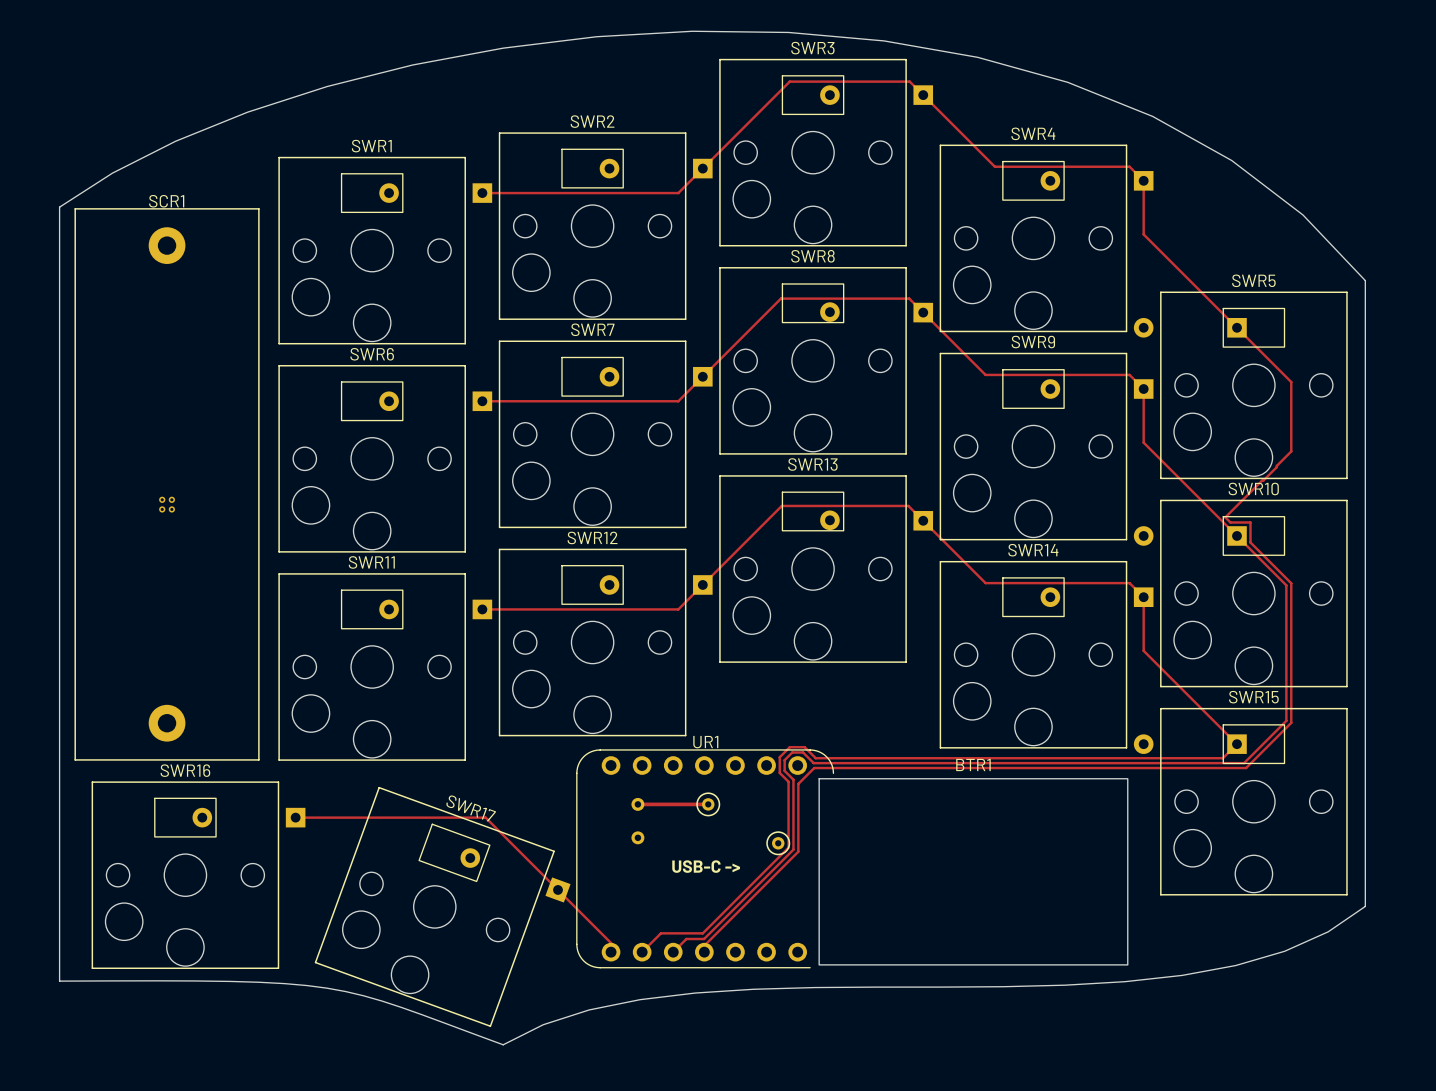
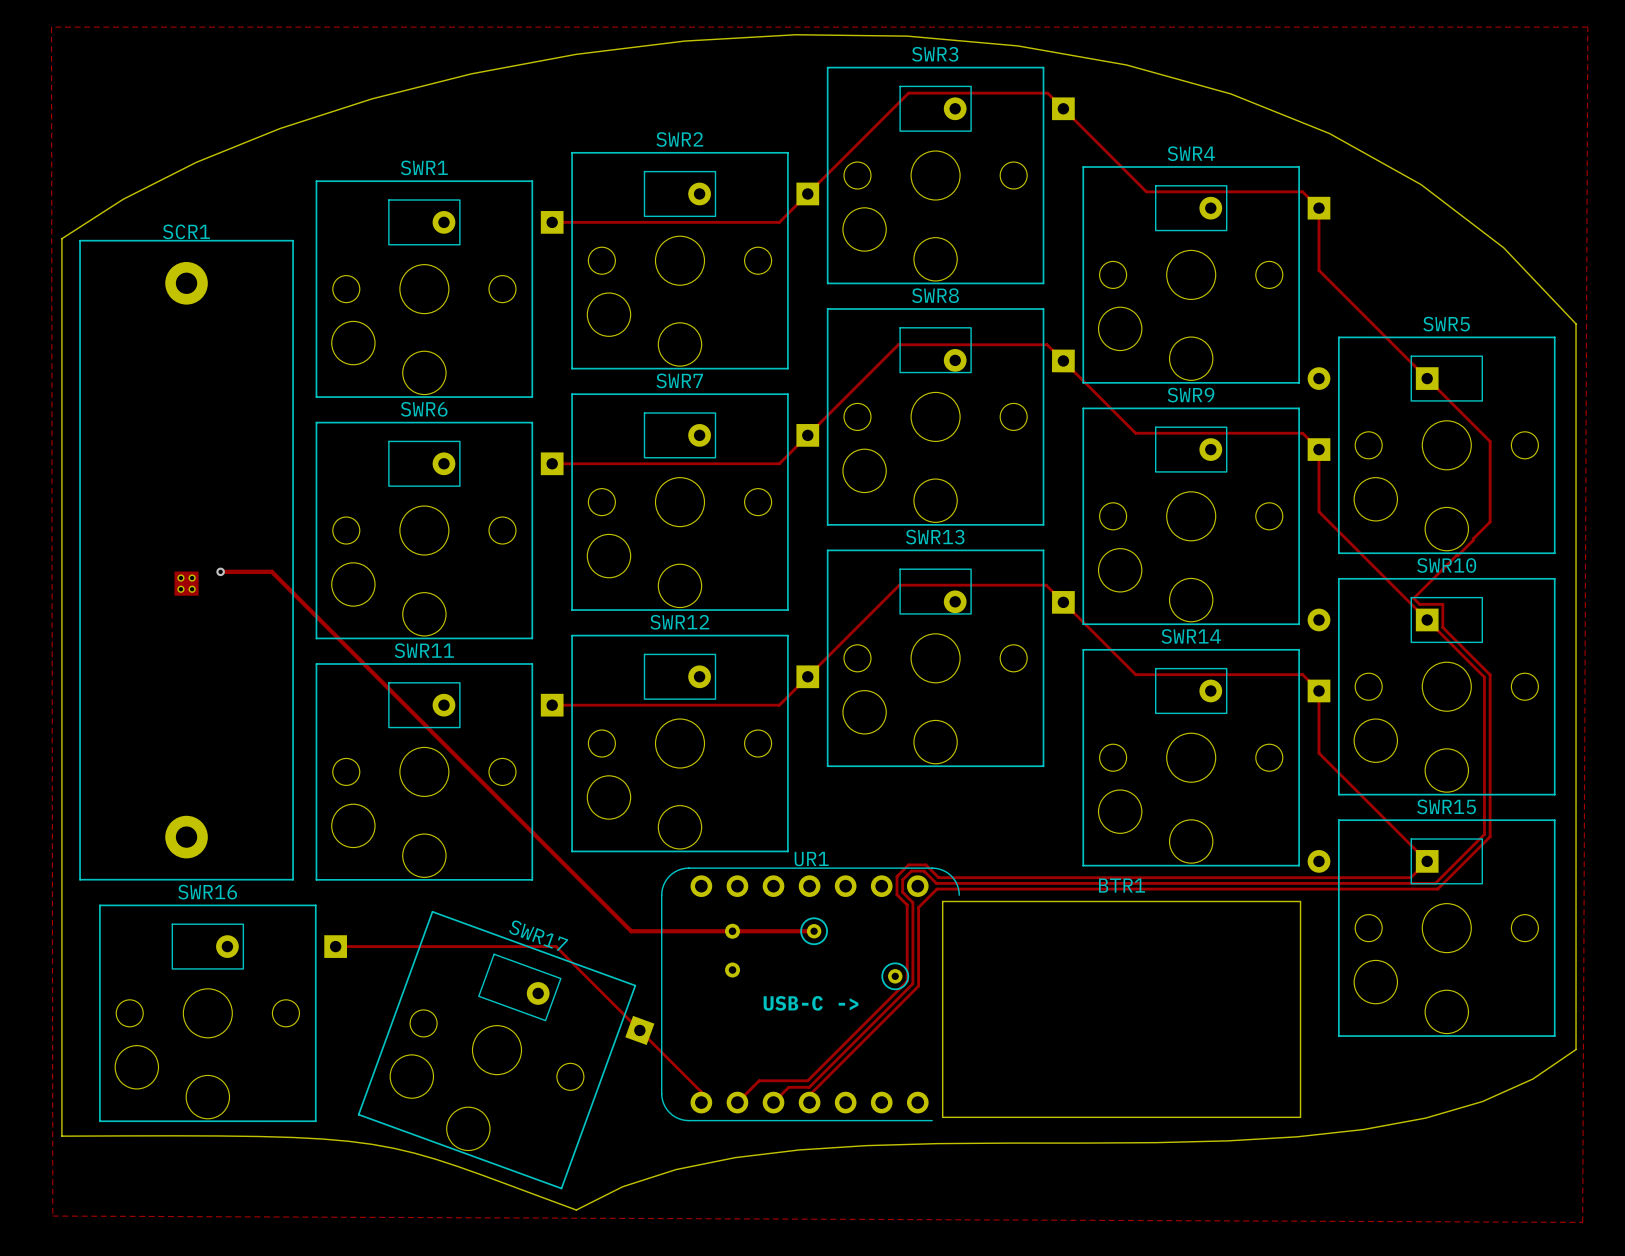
zone outline: none -> (51, 27) (1587, 27) (1582, 1222) (52, 1216) (51, 27)
track: none -> (220, 571) (271, 571) (631, 931) (732, 931)
via: none -> (220, 571)
part footprint: [159, 496, 175, 513] -> [174, 571, 199, 596]

